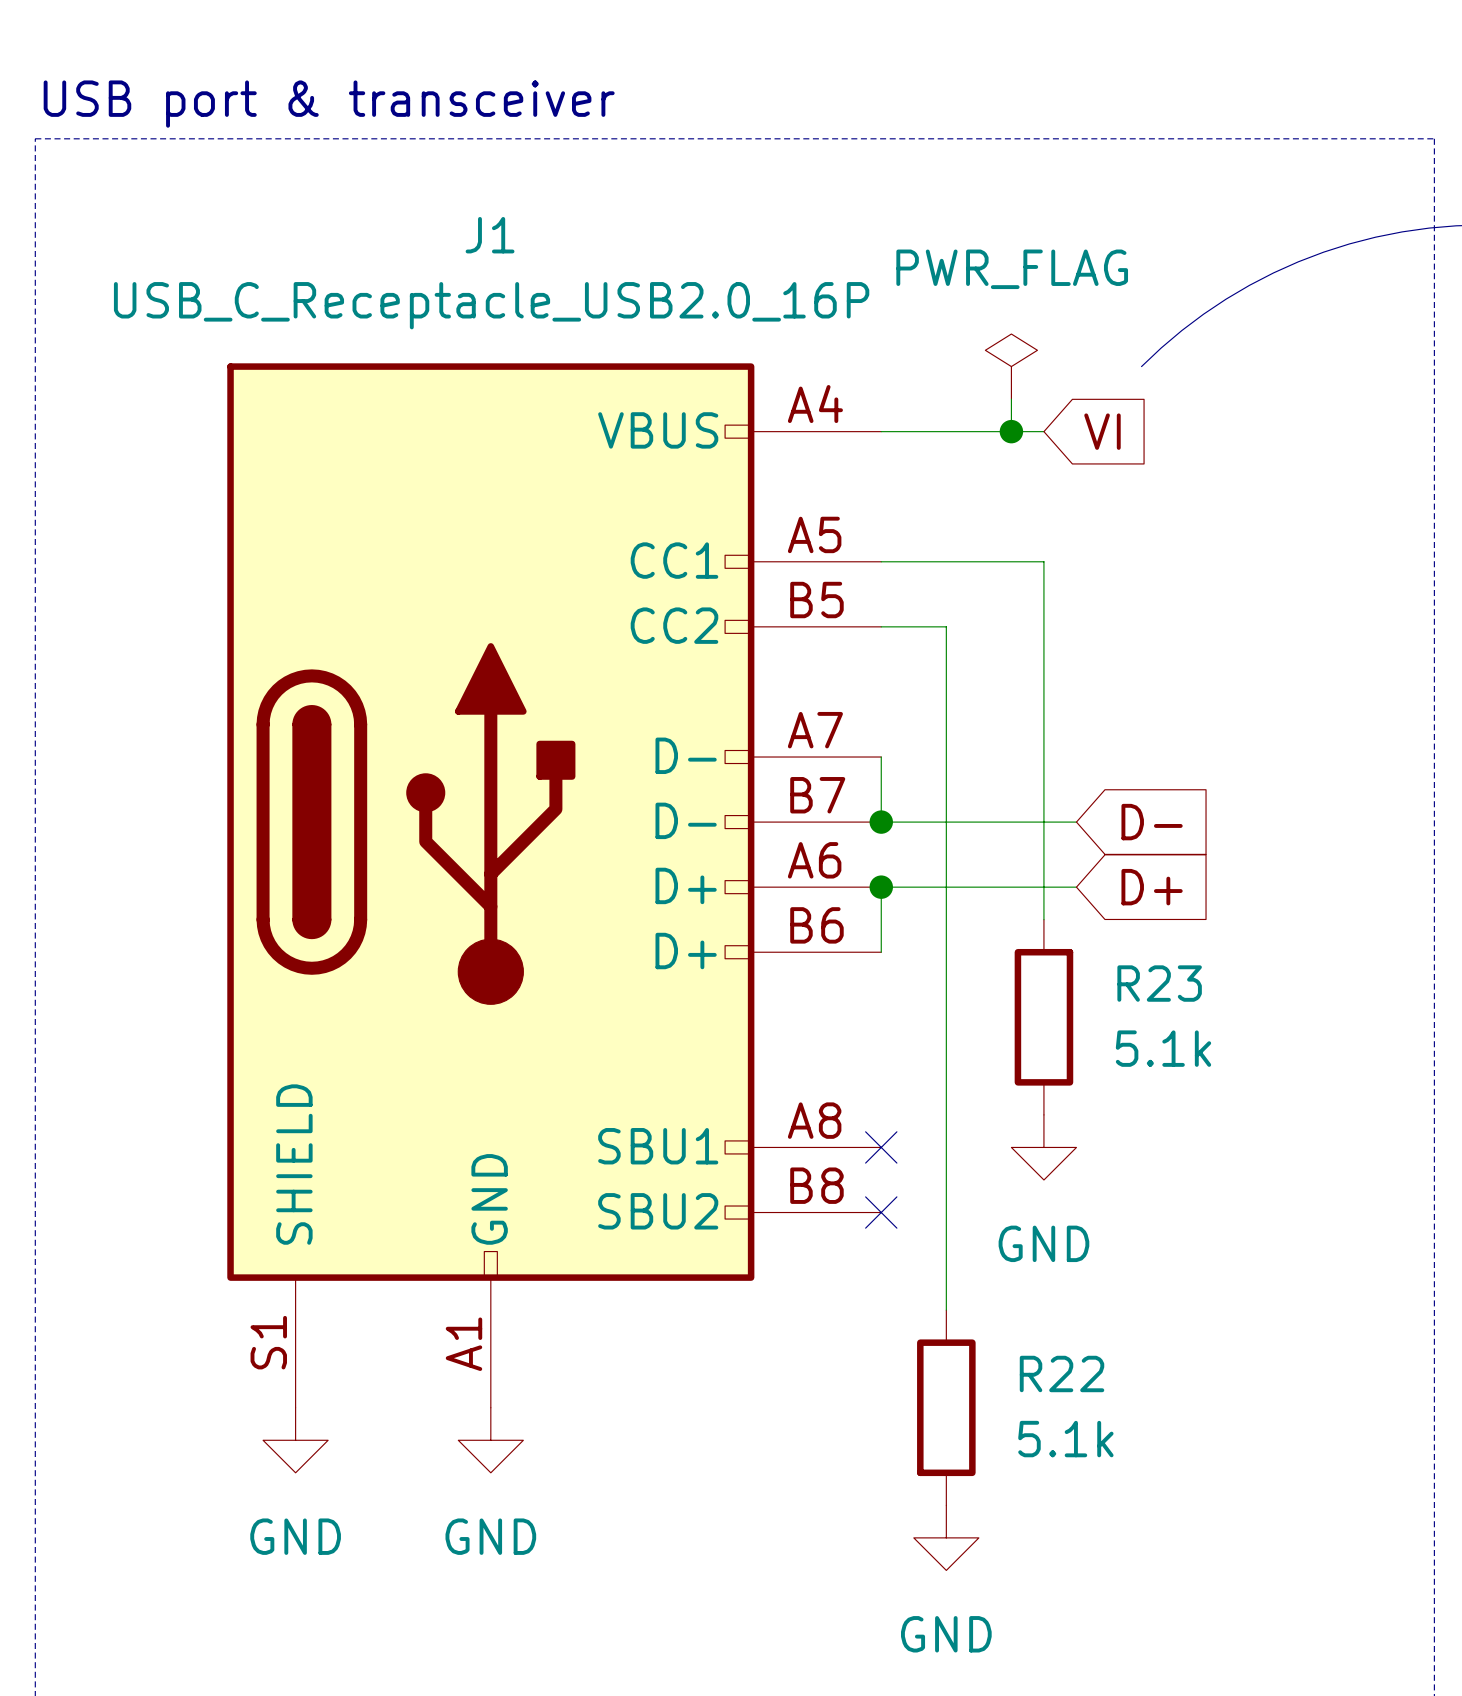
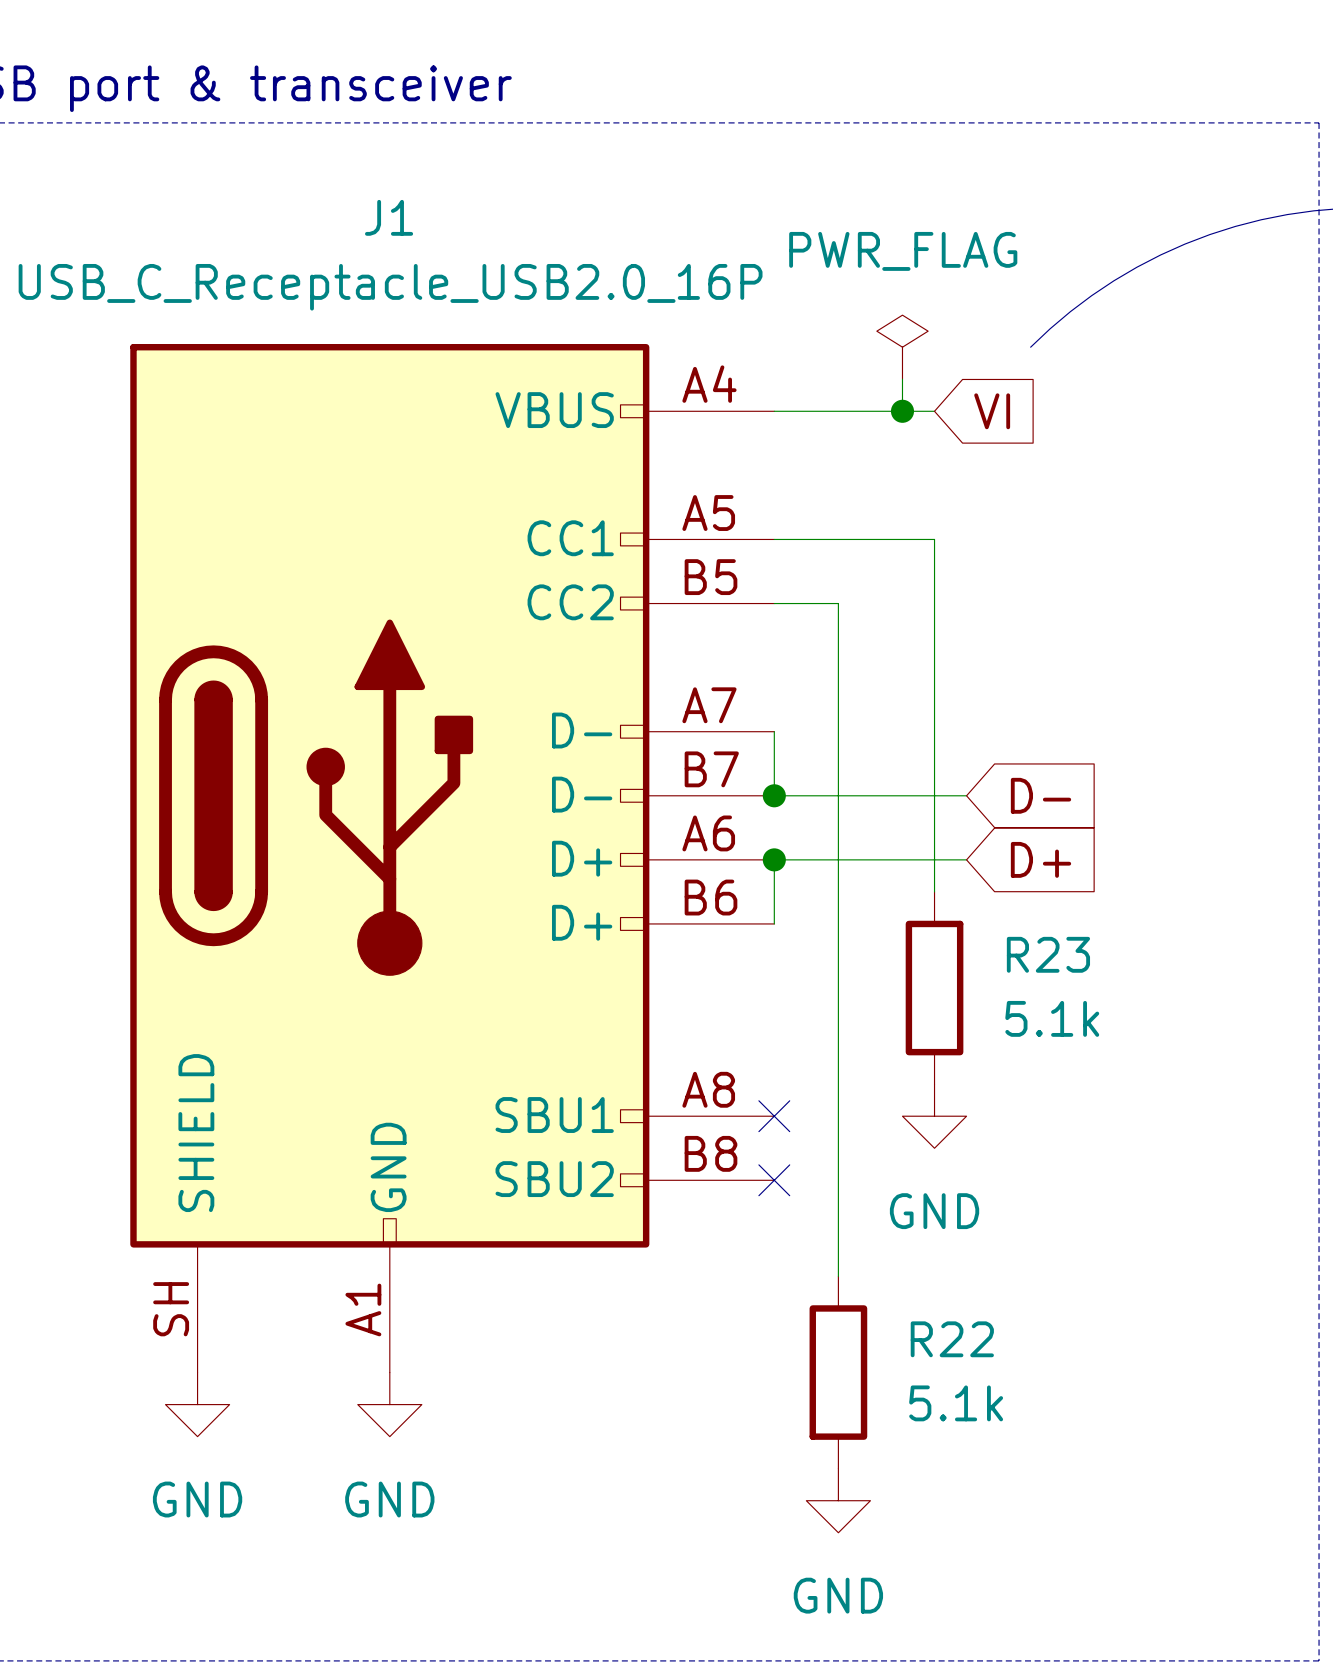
J1 pin number: S1 (268, 1342) -> SH (171, 1309)

